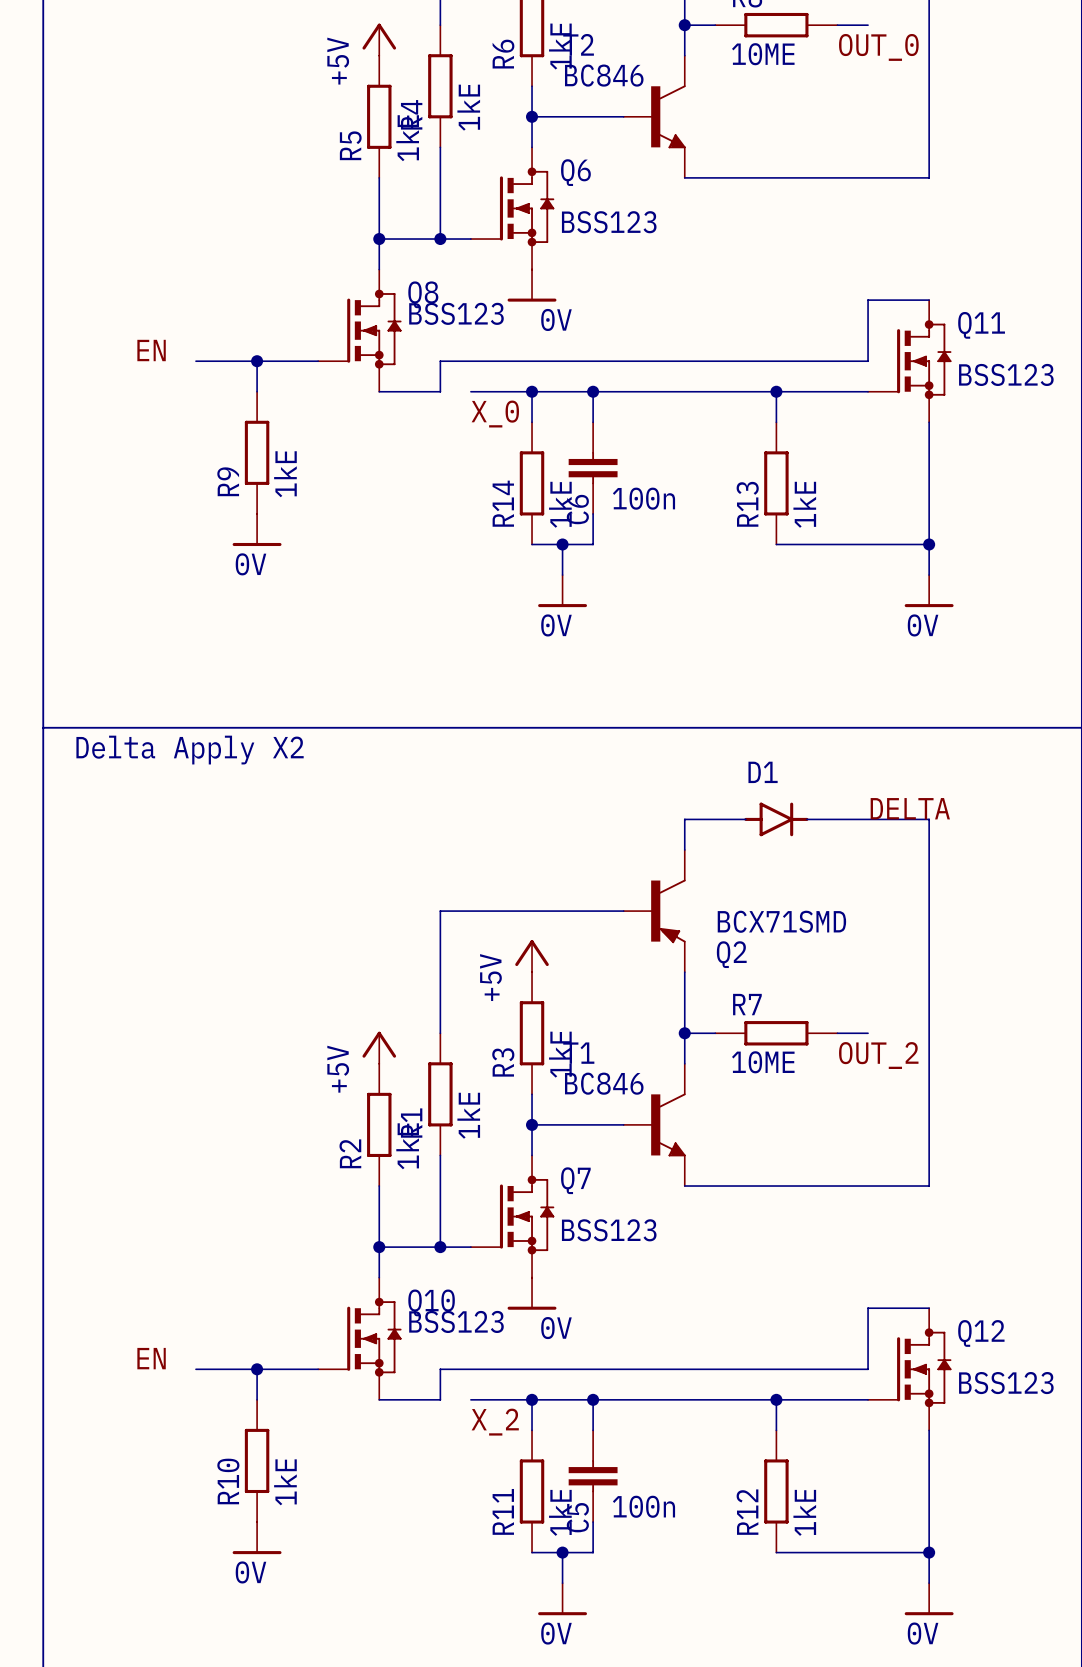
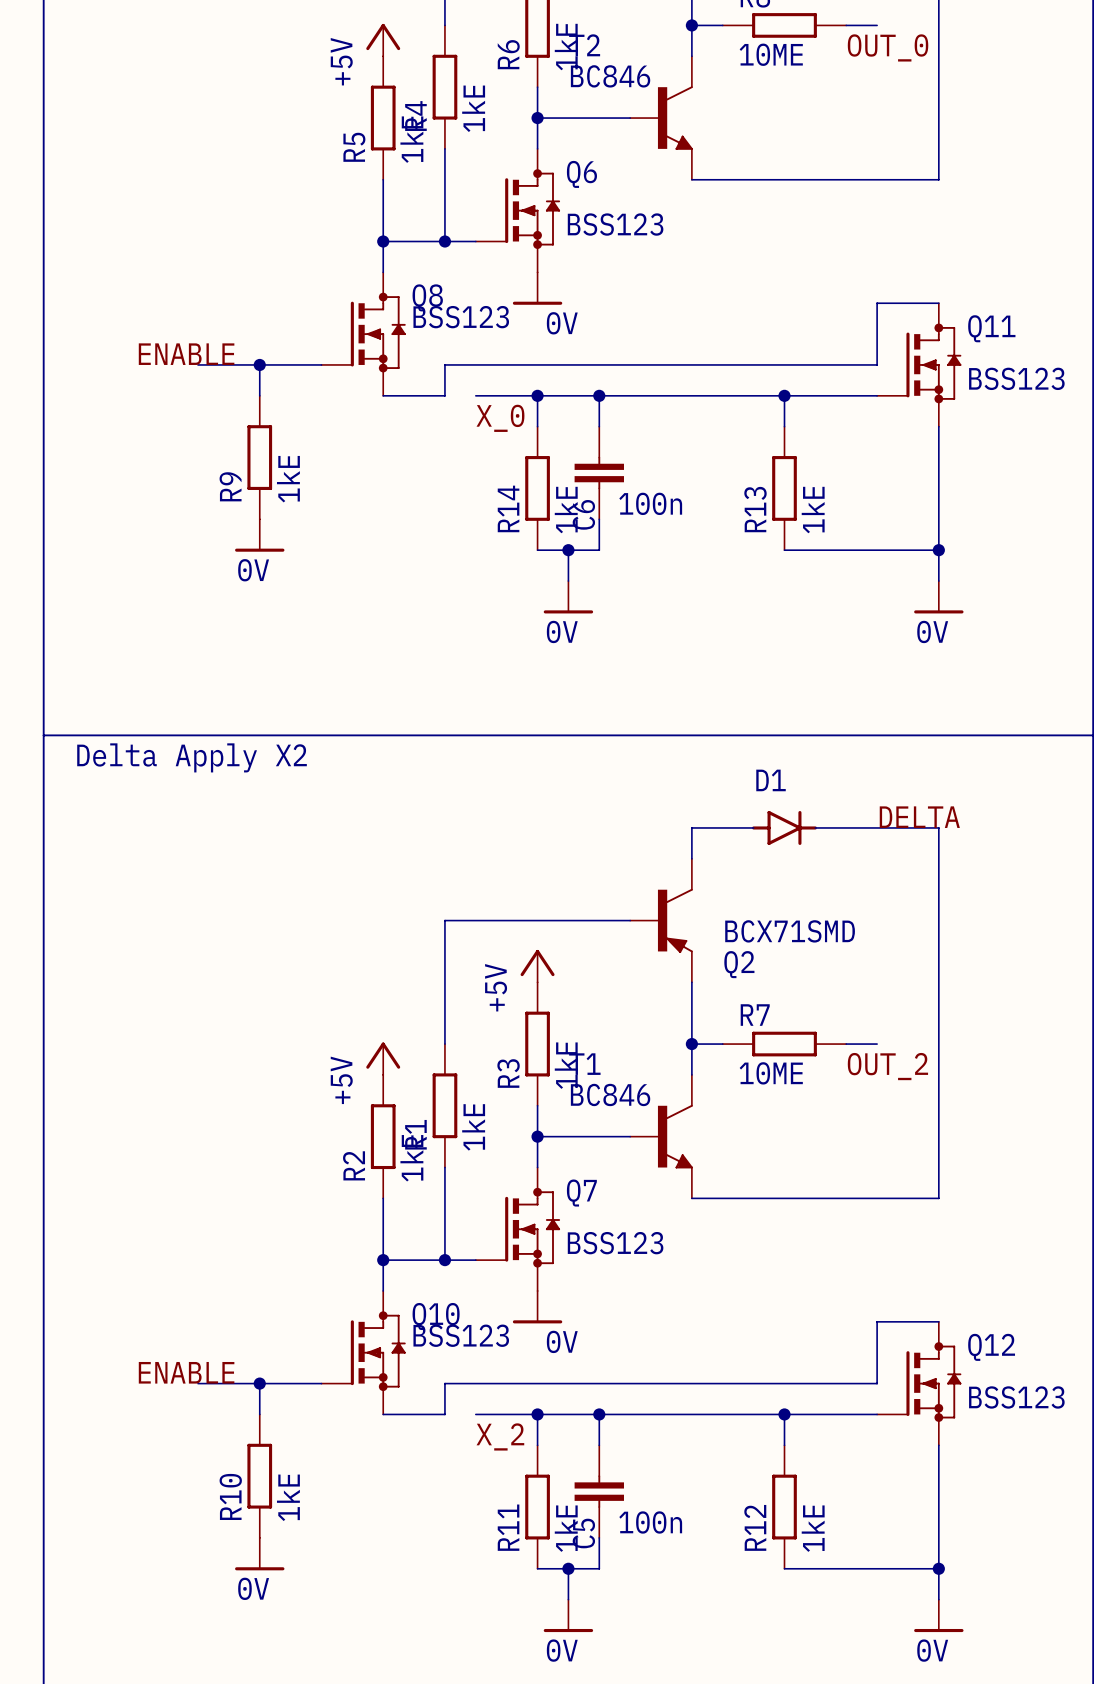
label: EN (151, 350) -> ENABLE (186, 354)
label: EN (151, 1358) -> ENABLE (186, 1372)

